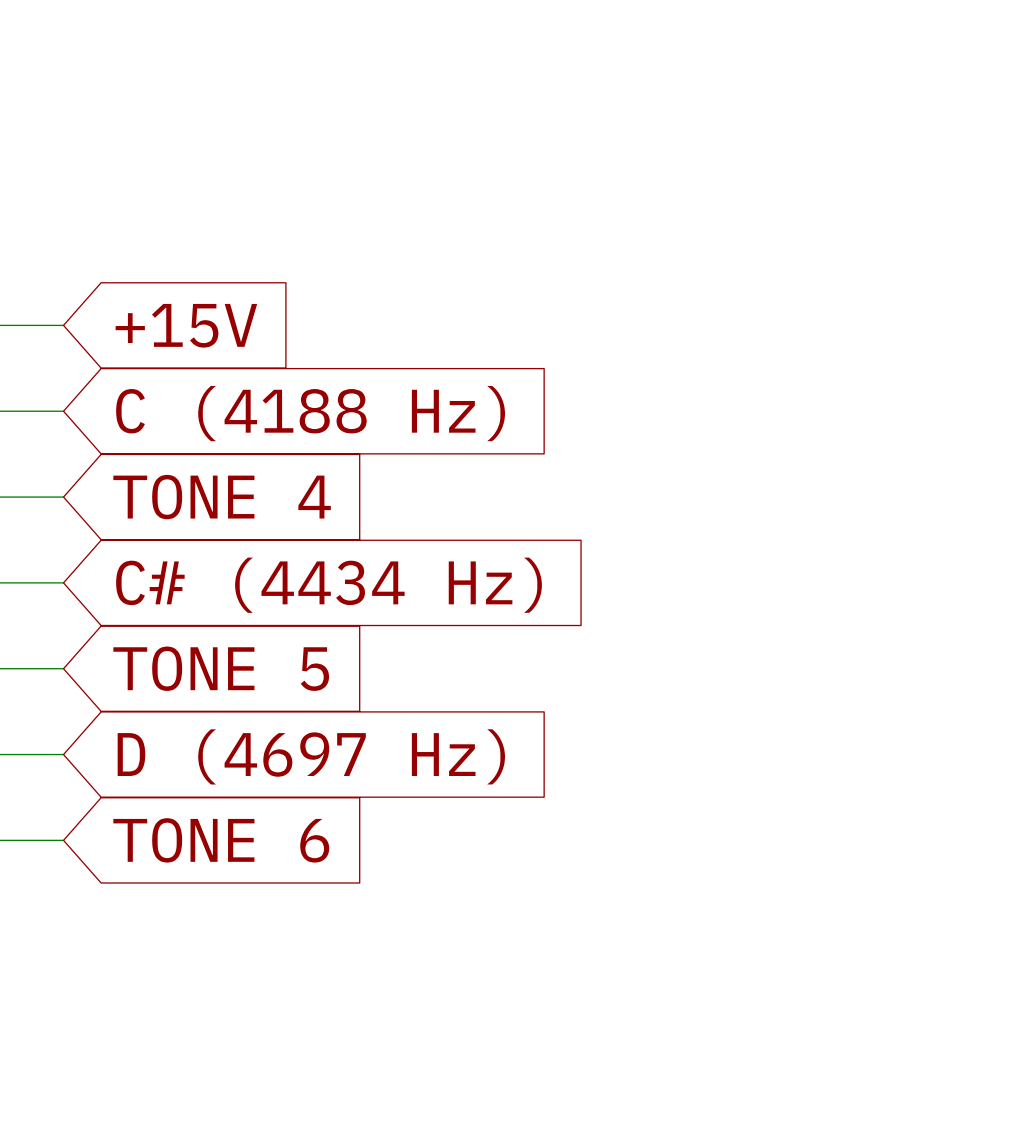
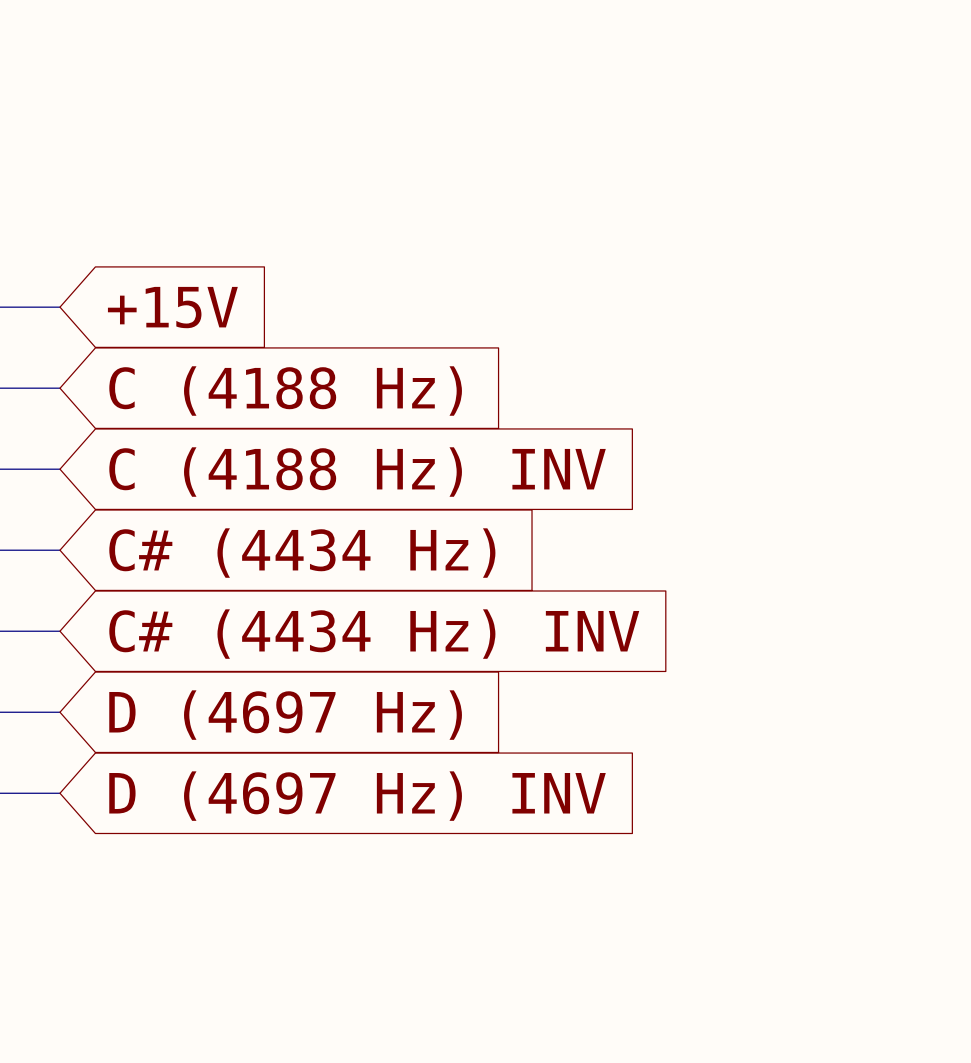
global label: TONE 4 (222, 497) -> C (4188 Hz) INV (357, 472)
global label: TONE 5 (221, 668) -> C# (4434 Hz) INV (374, 634)
global label: TONE 6 (221, 840) -> D (4697 Hz) INV (357, 796)

